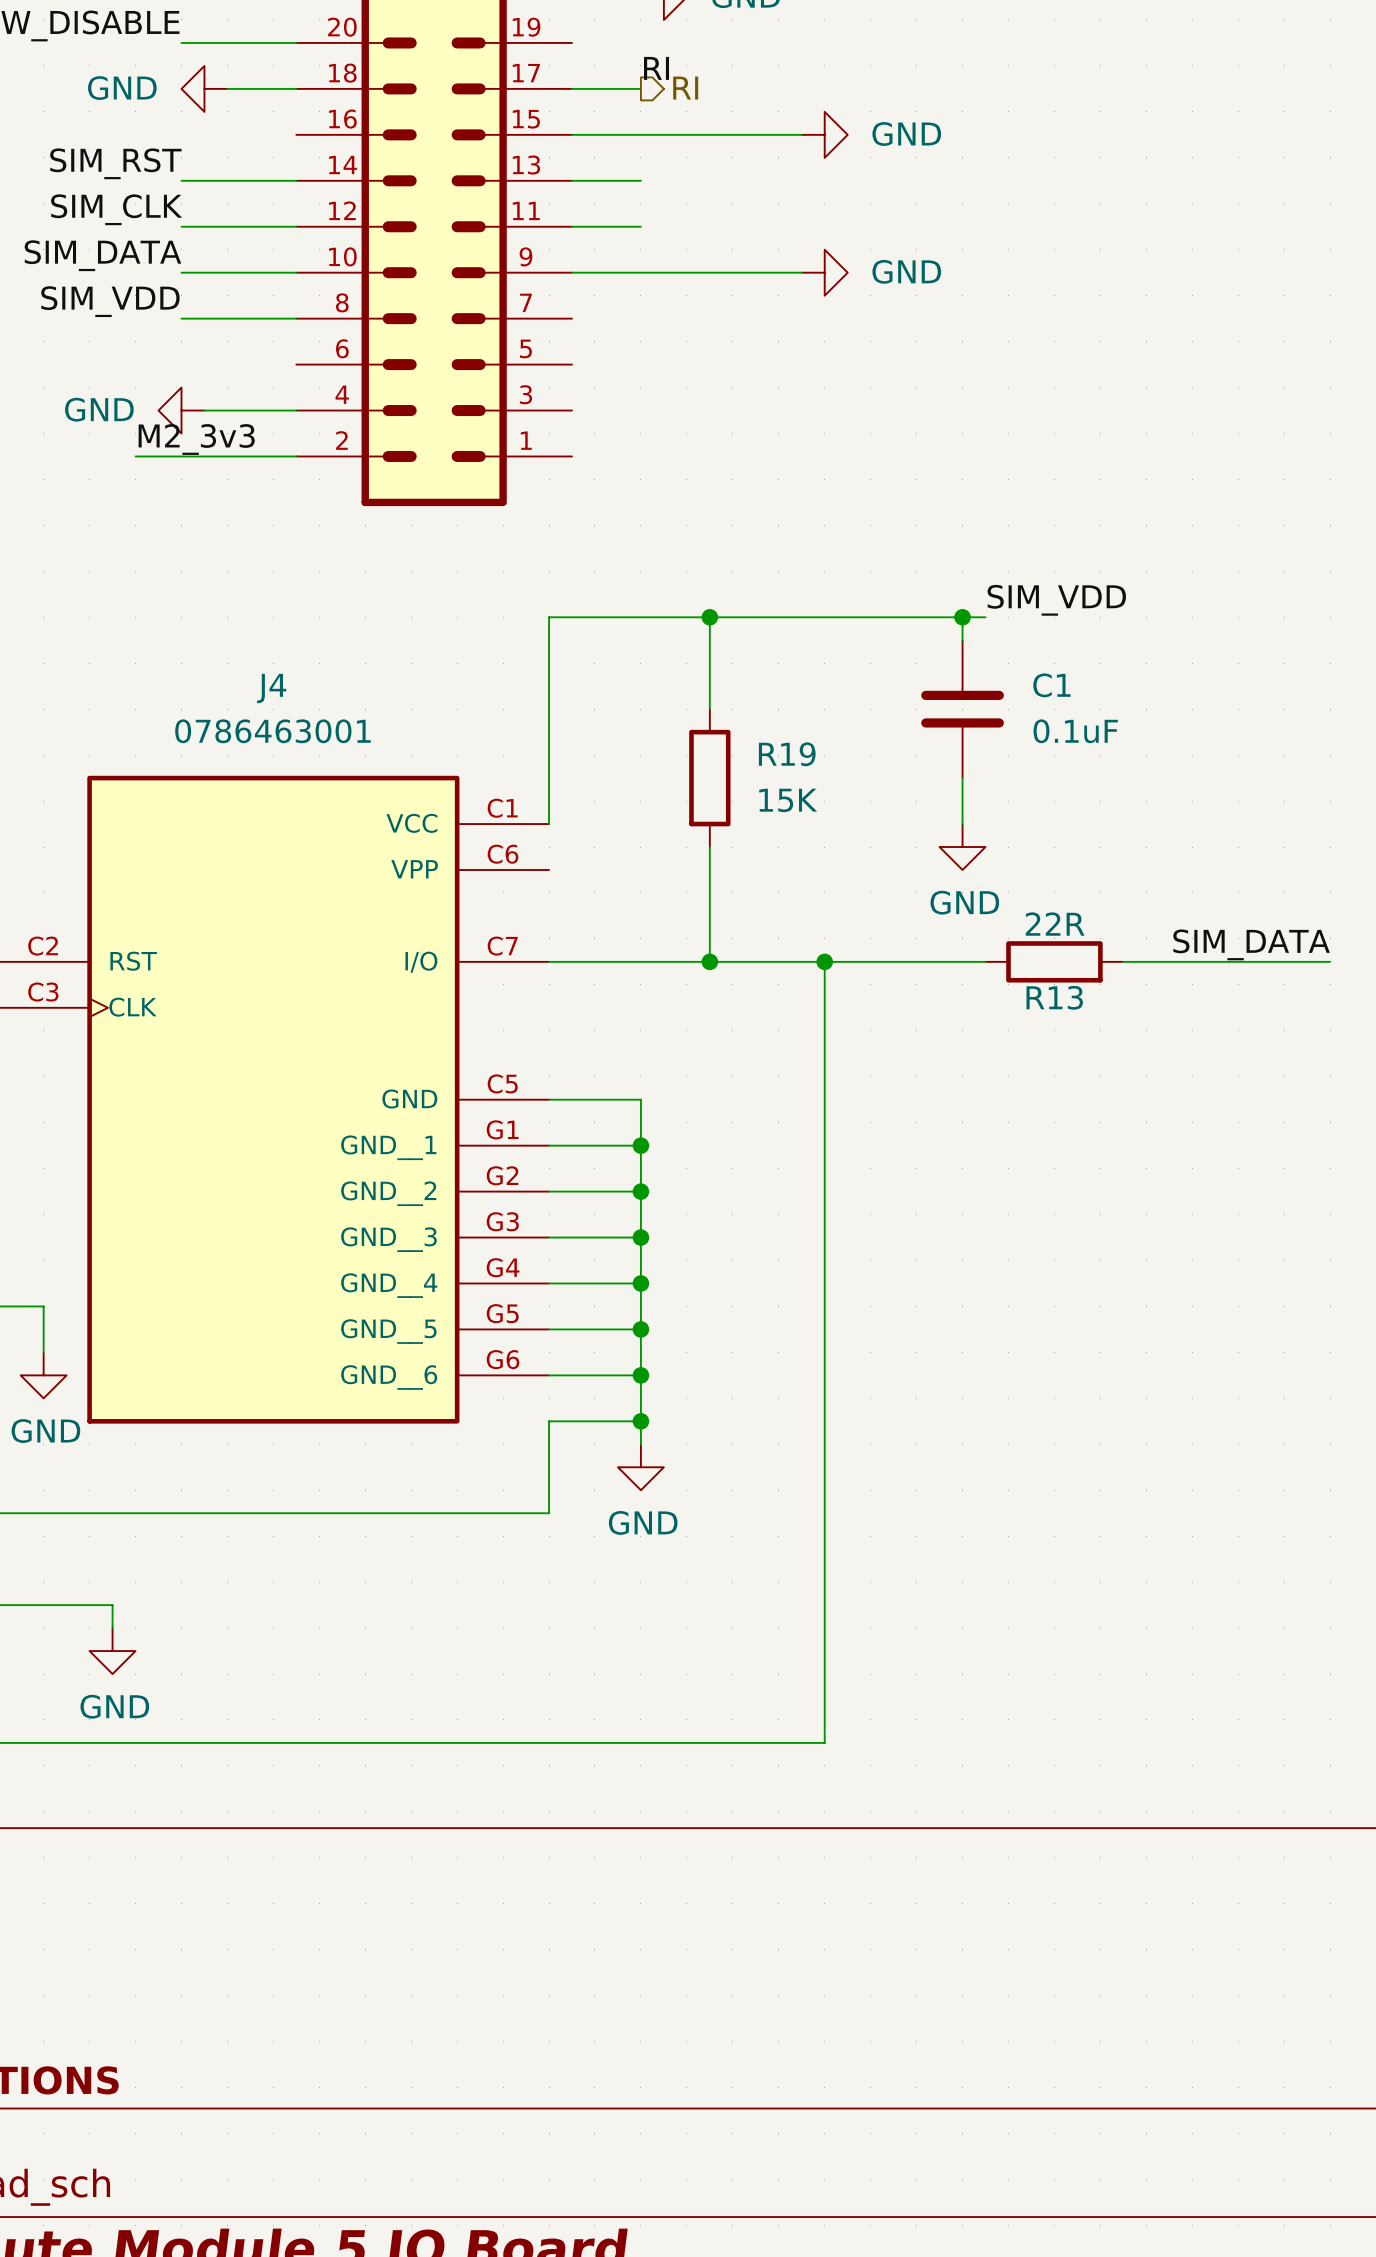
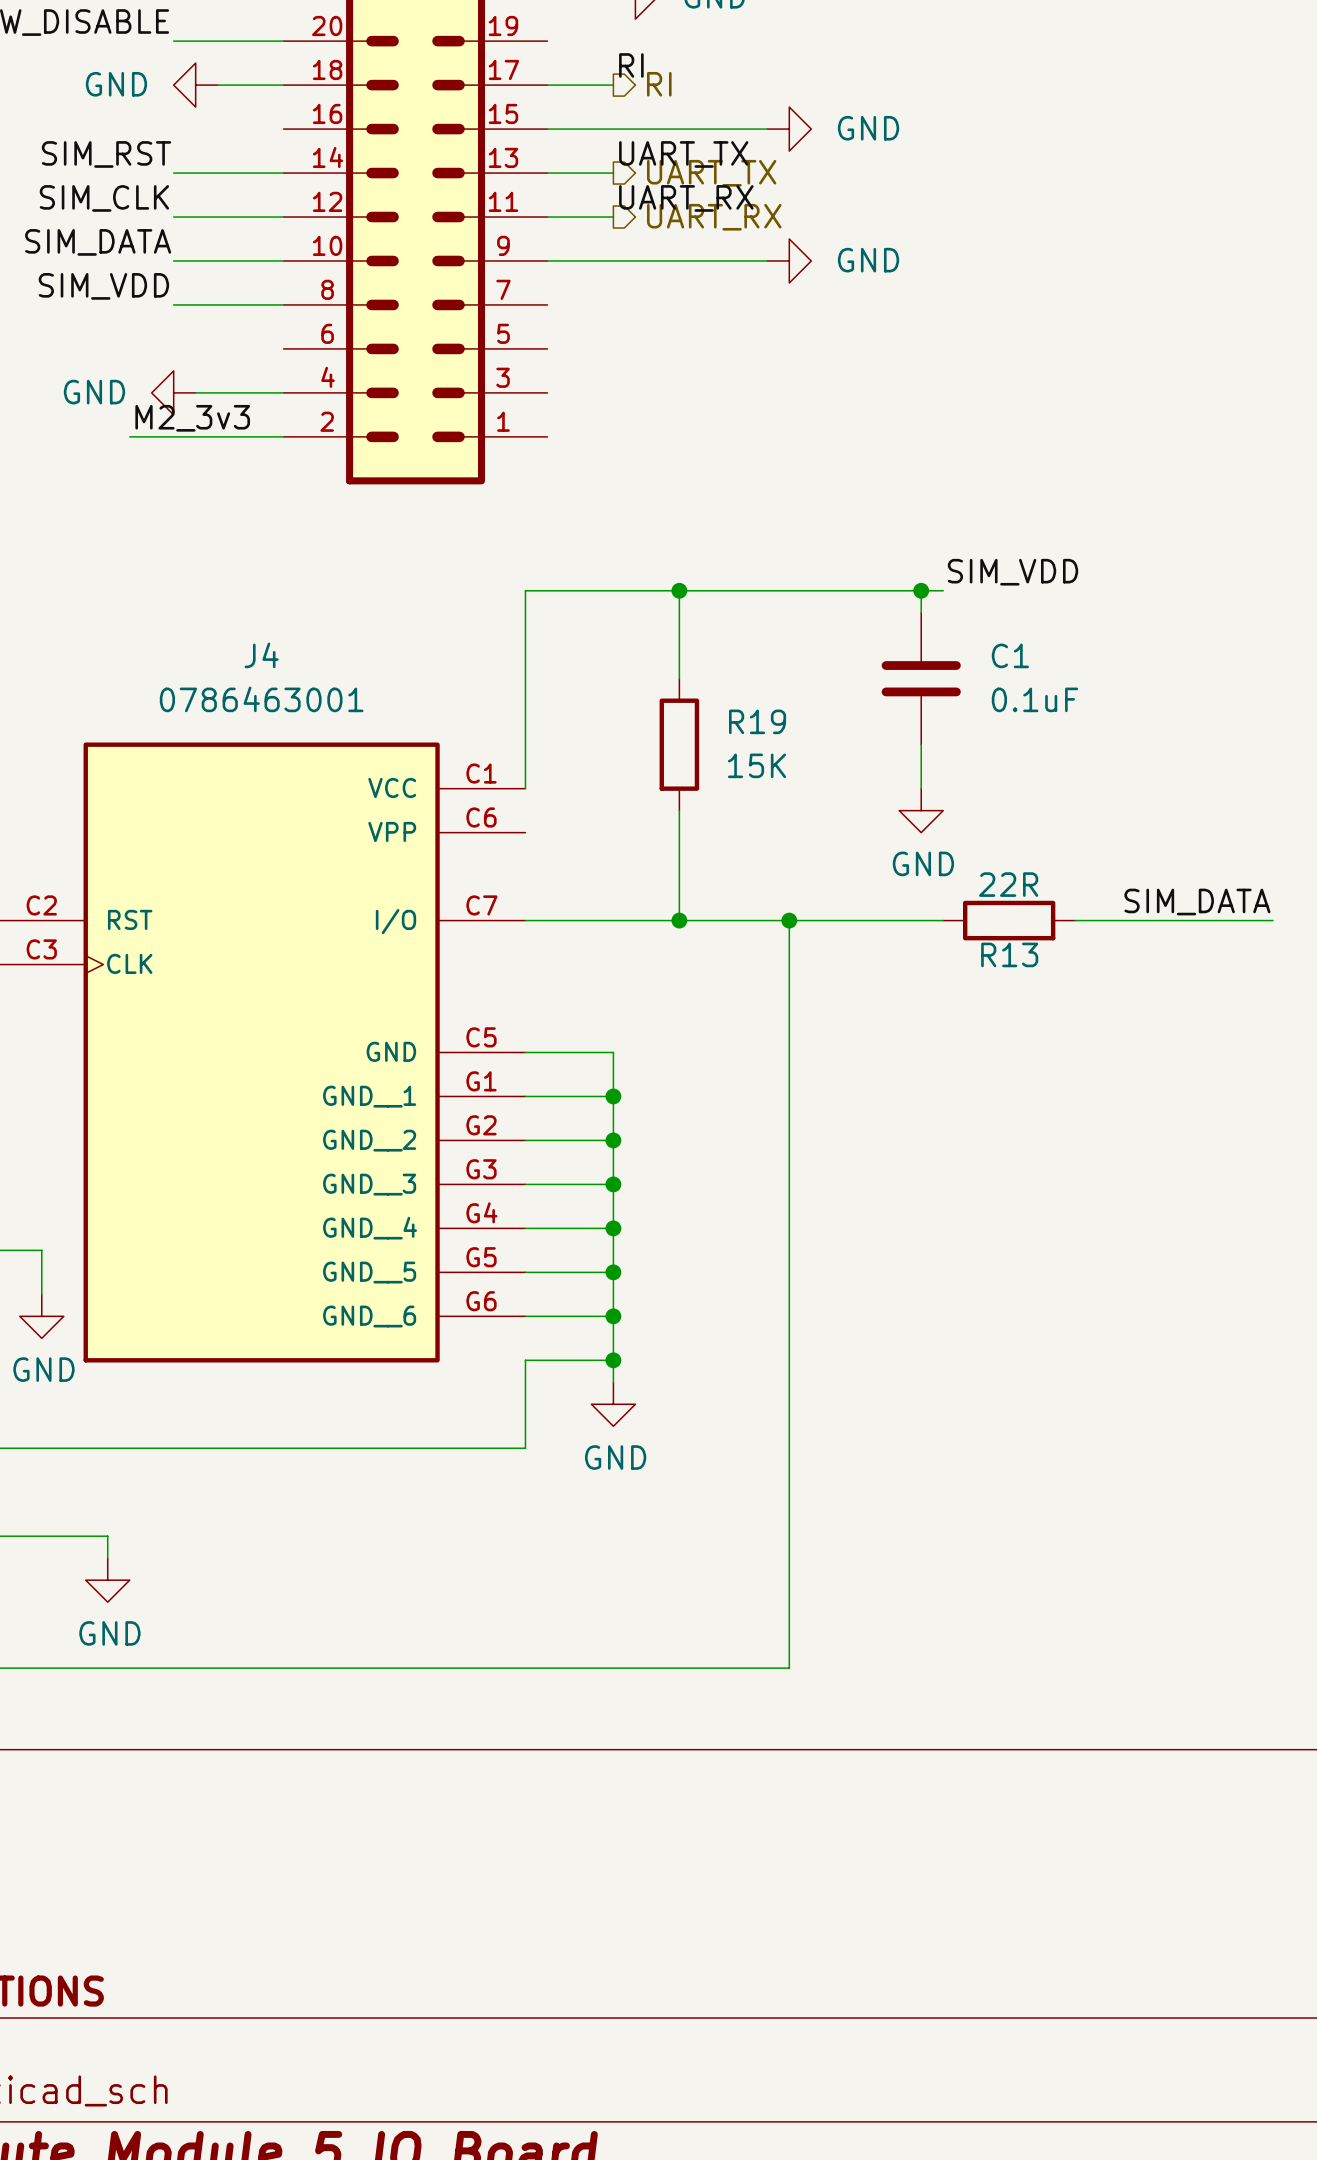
label: none -> UART_TX (683, 154)
hierarchical label: none -> UART_TX (711, 173)
label: none -> UART_RX (686, 198)
hierarchical label: none -> UART_RX (714, 217)

